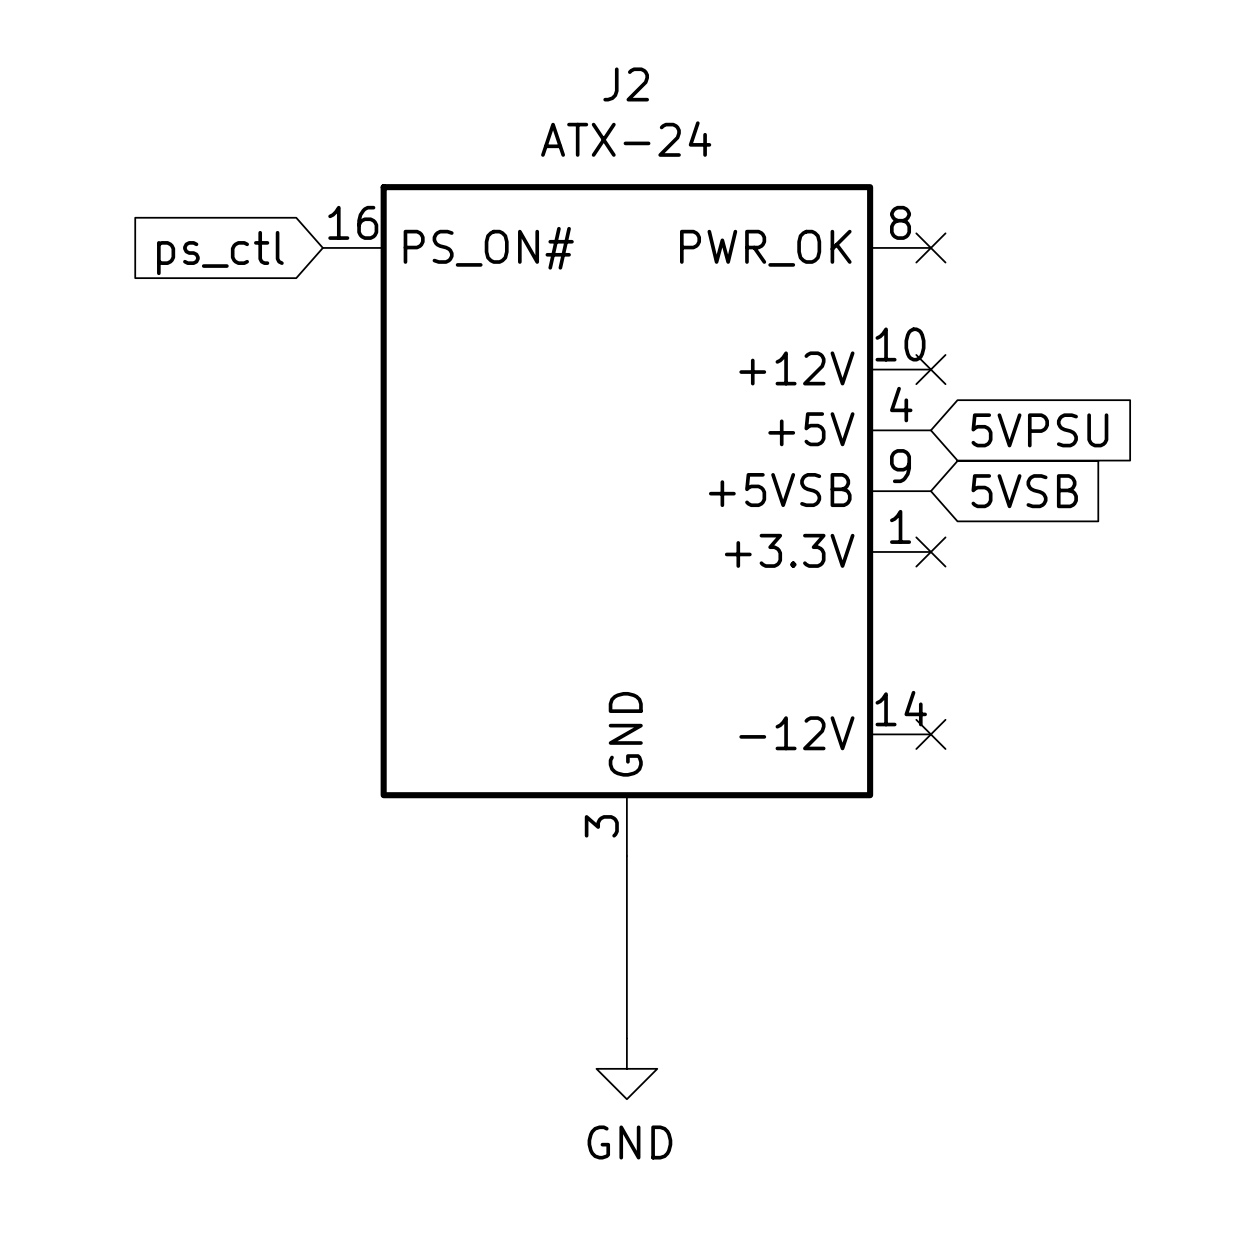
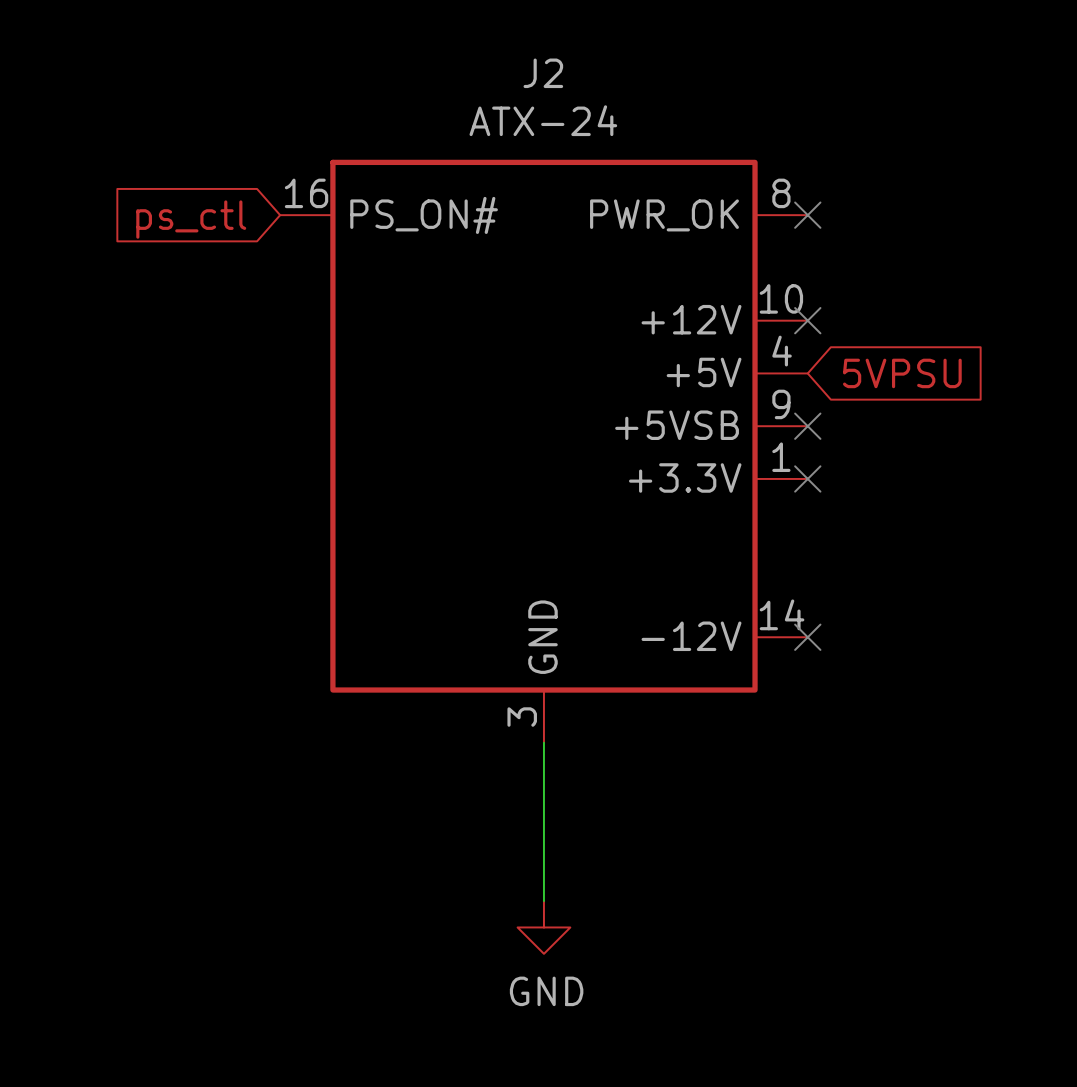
no-connect mark: none -> (807, 426)
global label: 5VSB (1024, 491) -> none

